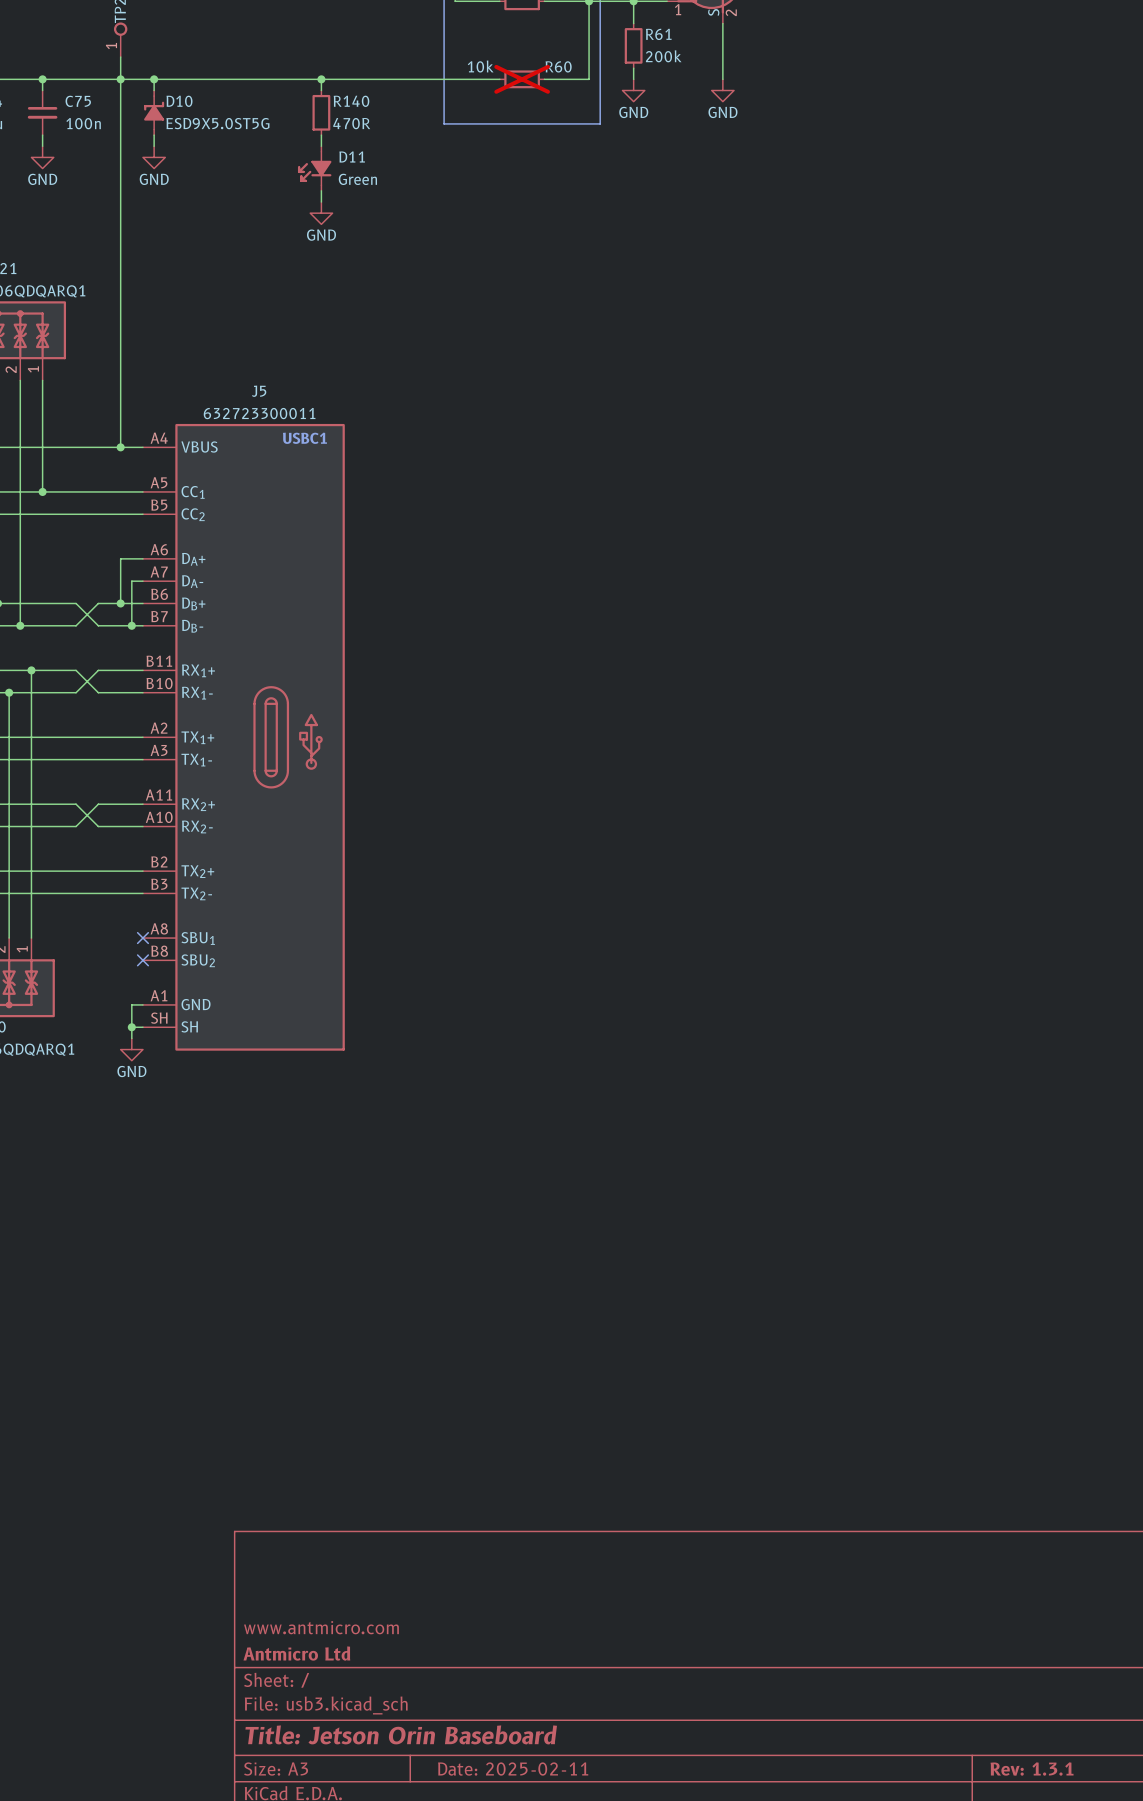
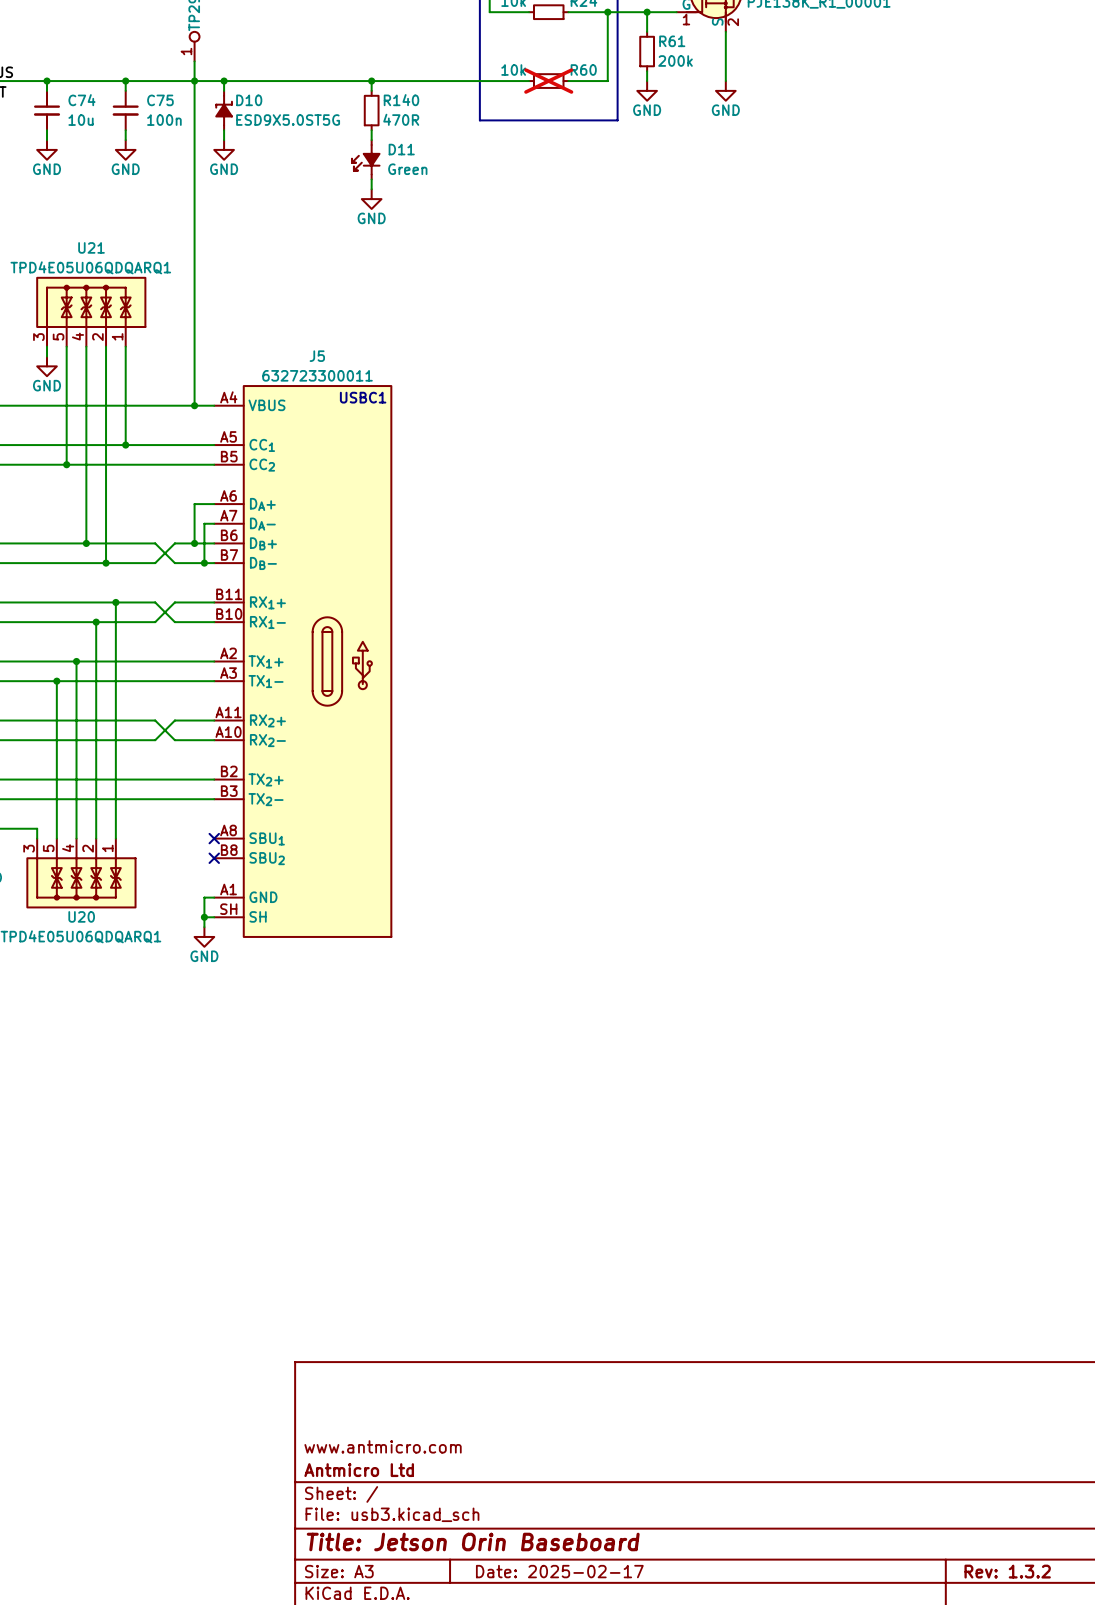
title block: Date: 2025-02-11 (513, 1769) -> Date: 2025-02-17 (559, 1571)
title block: Rev: 1.3.1 (1032, 1769) -> Rev: 1.3.2 (1007, 1571)

